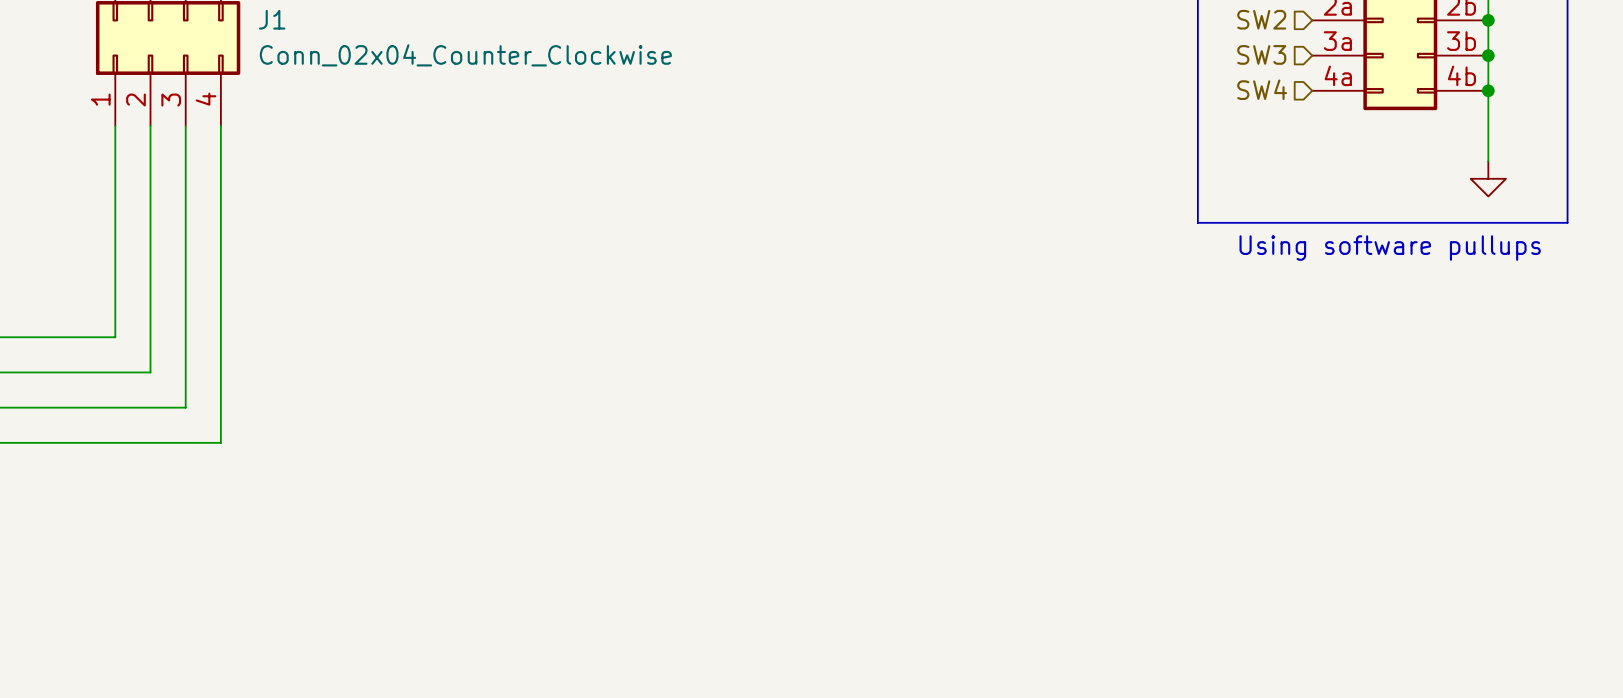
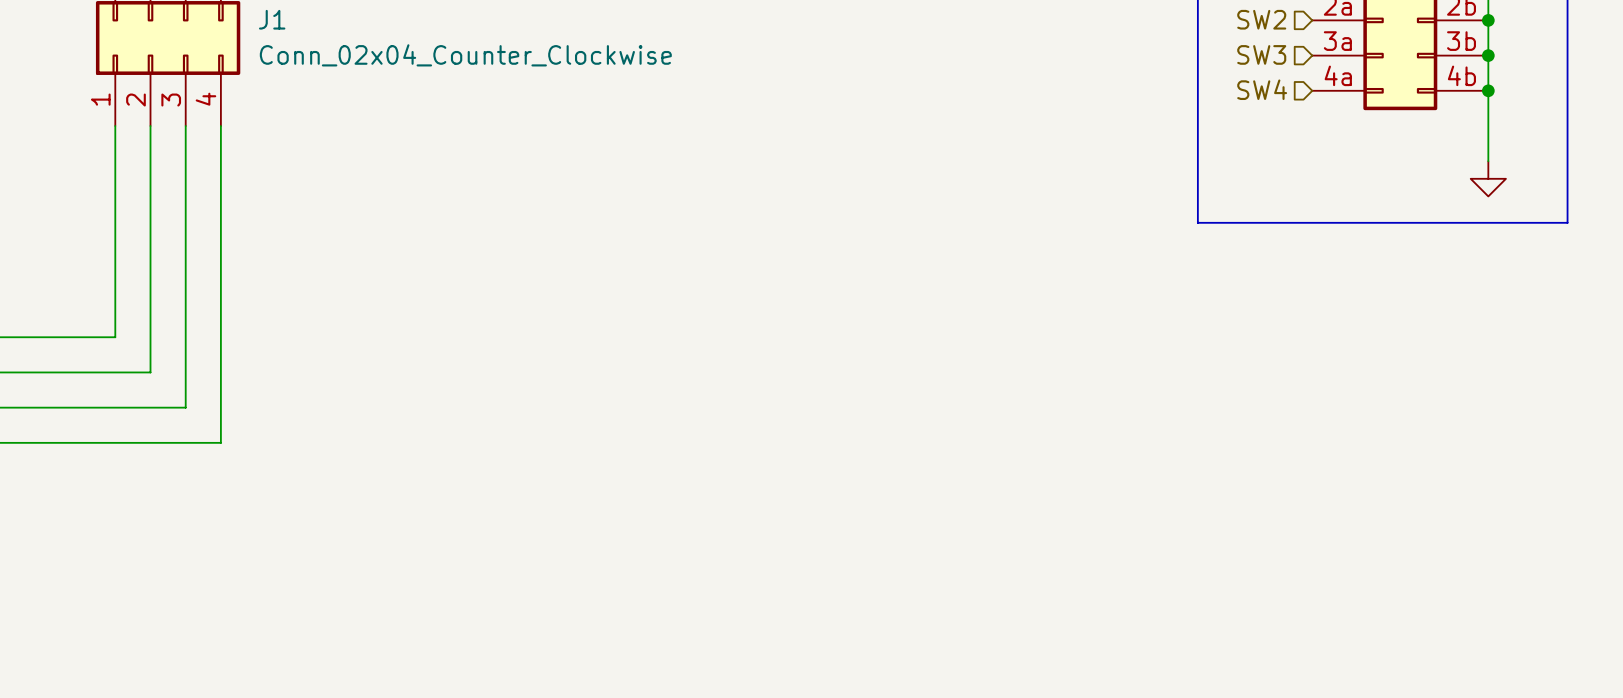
text: Using software pullups (1390, 248) -> none

